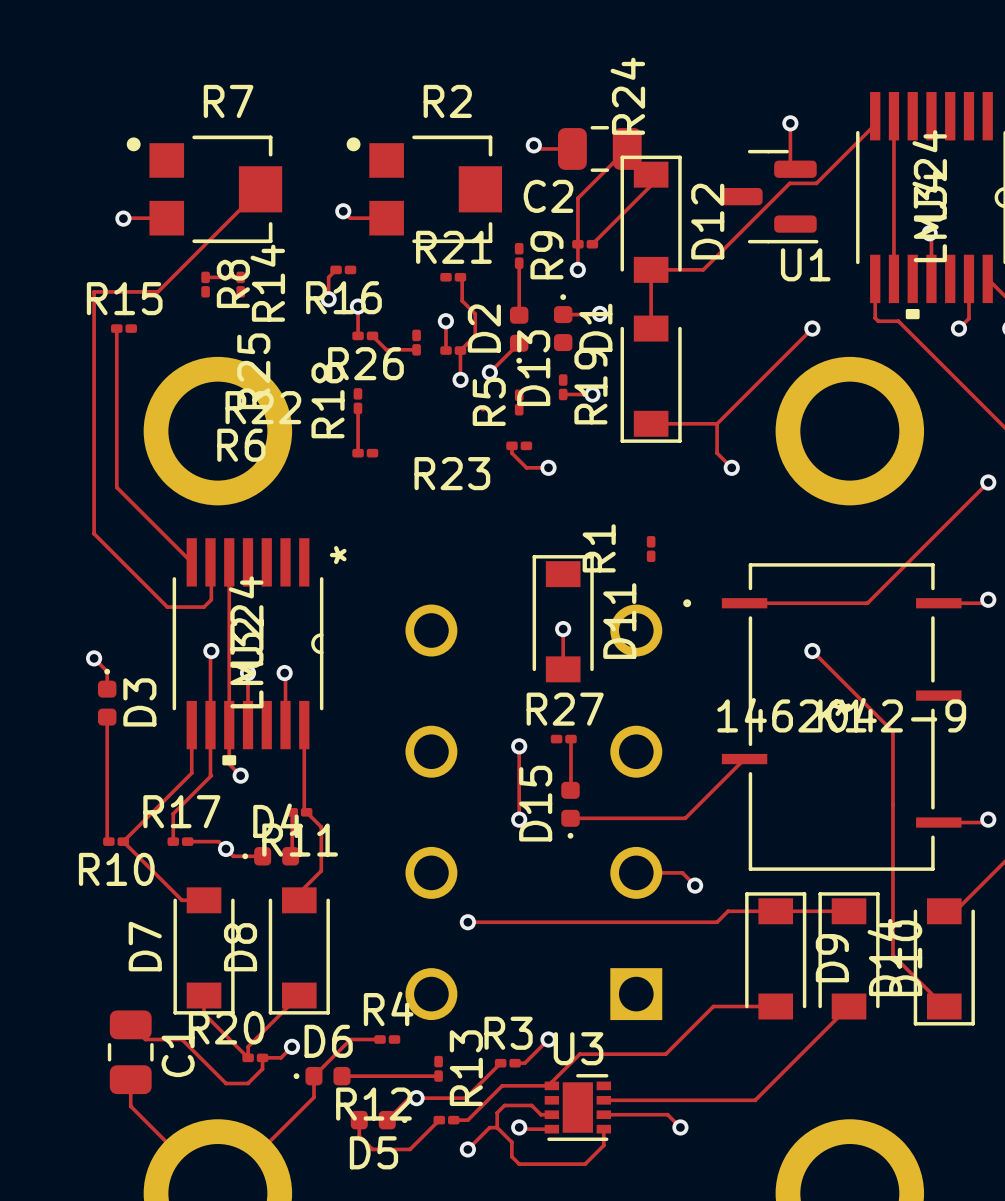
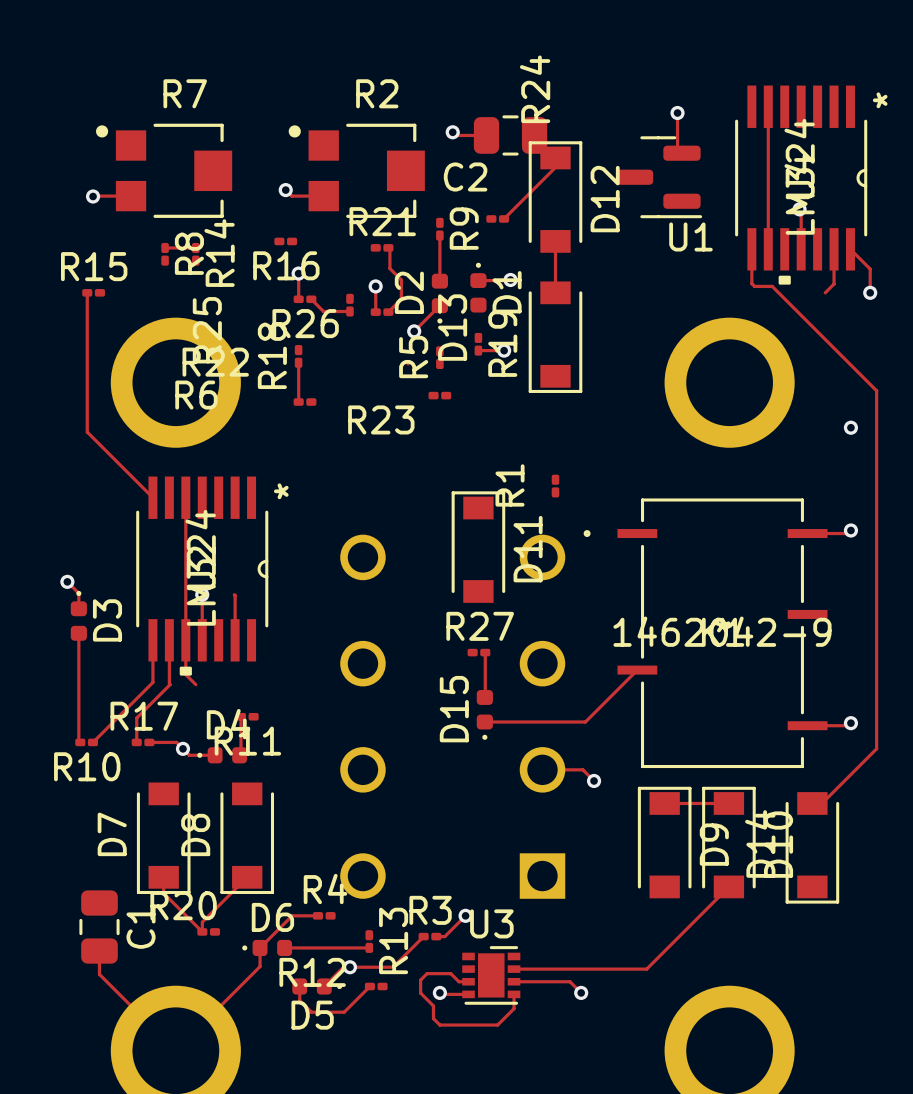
track: (875, 116) (875, 124) (816, 183) (789, 183) (703, 269) (651, 269) -> none
track: (627, 148) (577, 198) (577, 269) -> none
track: (260, 189) (157, 291) (94, 291) (94, 533) (167, 607) (204, 607) (211, 599) (210, 562) -> none
track: (336, 269) (328, 277) (328, 299) -> none
via: (577, 269) -> none
via: (328, 299) -> none
track: (812, 328) (717, 423) -> none
via: (812, 328) -> none
via: (958, 328) -> none
track: (460, 350) (460, 379) -> none
via: (460, 379) -> none
track: (651, 423) (717, 423) -> none
track: (717, 423) (717, 453) (731, 467) -> none
track: (511, 445) (511, 453) (526, 467) (548, 467) -> none
via: (548, 467) -> none
via: (731, 467) -> none
track: (988, 482) (867, 603) (744, 603) -> none
track: (563, 629) (563, 669) -> none
via: (563, 629) -> none
track: (211, 651) (210, 725) -> none
via: (211, 651) -> none
track: (812, 651) (892, 731) (892, 955) (944, 1006) -> none
via: (812, 651) -> none
via: (284, 673) -> none
track: (304, 725) (304, 809) (321, 826) (321, 870) (299, 892) (299, 900) -> none
track: (519, 746) (519, 819) -> none
via: (519, 746) -> none
via: (240, 775) -> none
via: (519, 819) -> none
track: (123, 841) (181, 900) (204, 900) -> none
track: (775, 911) (728, 911) (717, 922) (467, 922) -> none
via: (467, 922) -> none
track: (775, 1006) (713, 1006) (665, 1054) (579, 1054) (551, 1082) (551, 1085) (502, 1085) (467, 1120) (453, 1120) -> none
track: (130, 1024) (145, 1039) (182, 1039) (226, 1083) (248, 1083) (262, 1068) (262, 1057) (280, 1057) (291, 1046) -> none
via: (291, 1046) -> none
track: (497, 1127) (489, 1127) (467, 1149) -> none
via: (467, 1149) -> none

